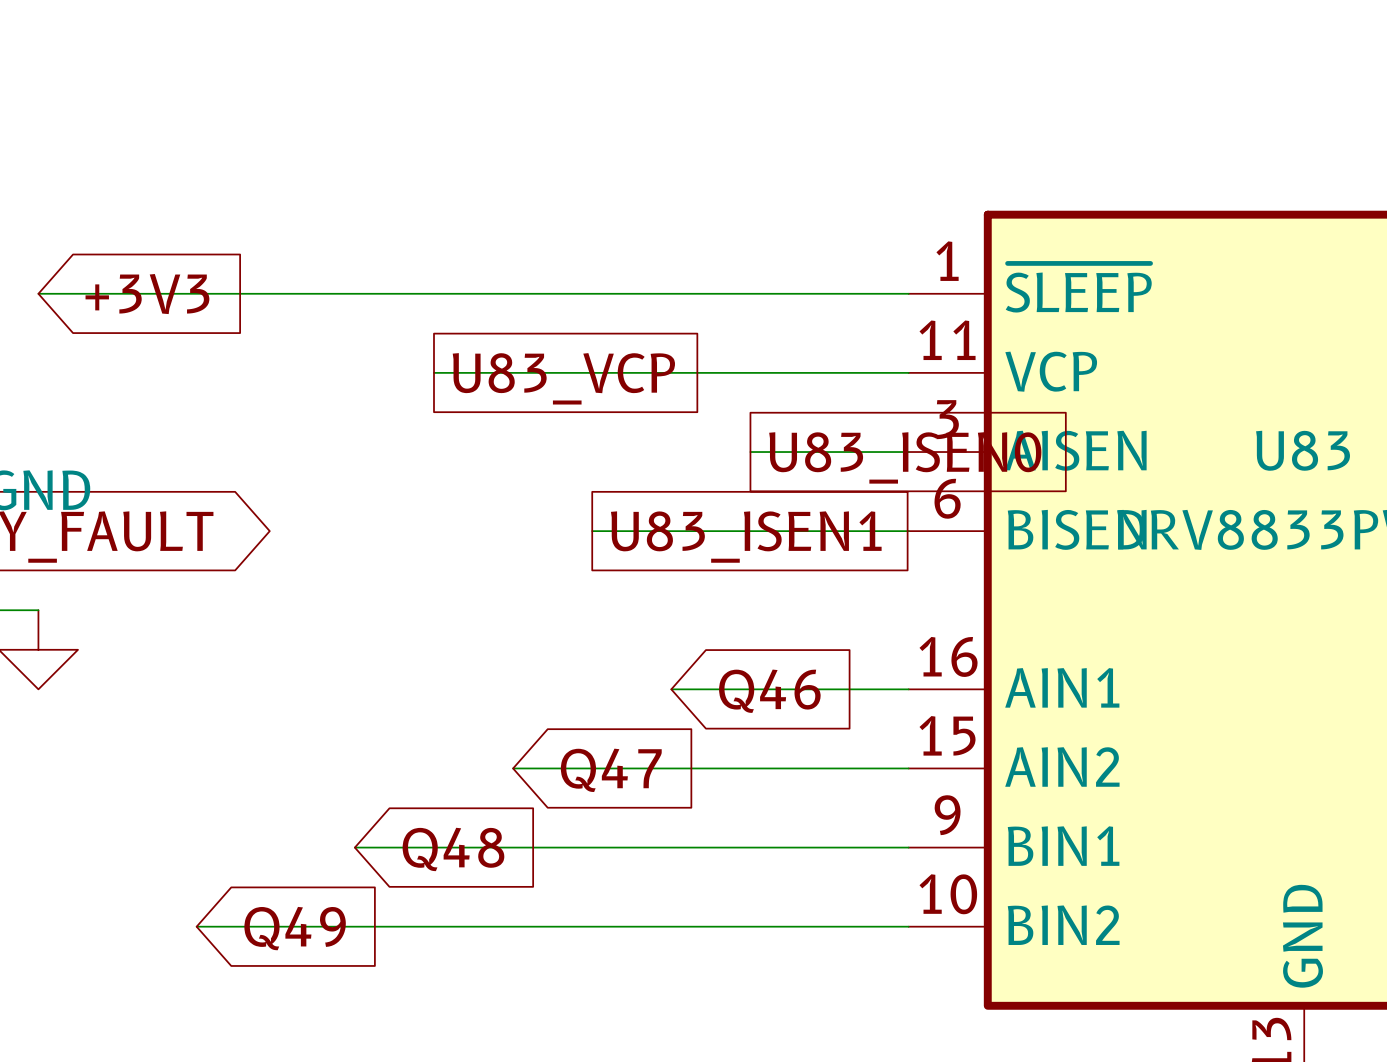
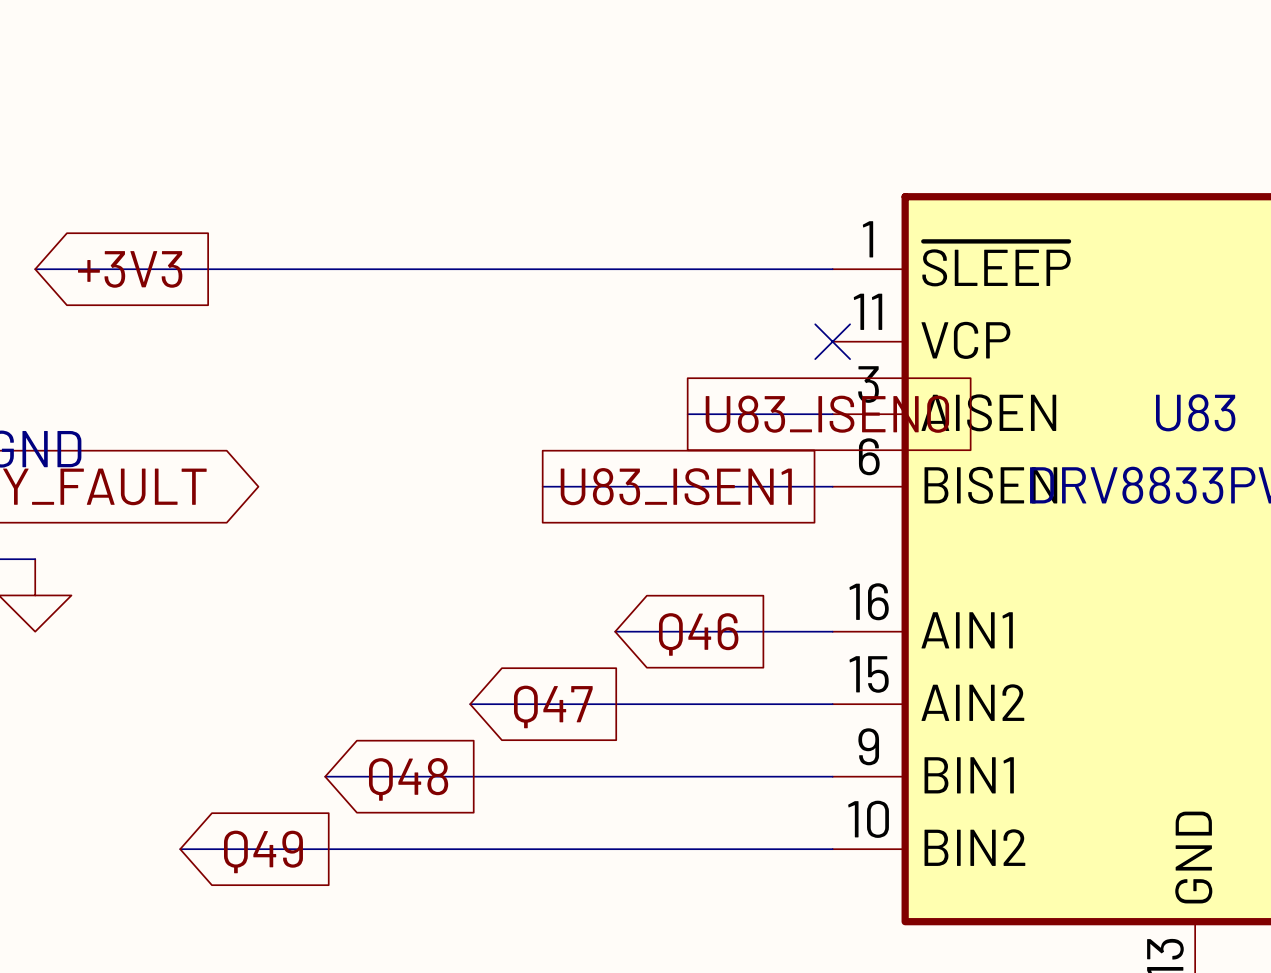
wire: (433, 372) (908, 372) -> none
no-connect mark: none -> (832, 341)
global label: U83_VCP (563, 378) -> none

